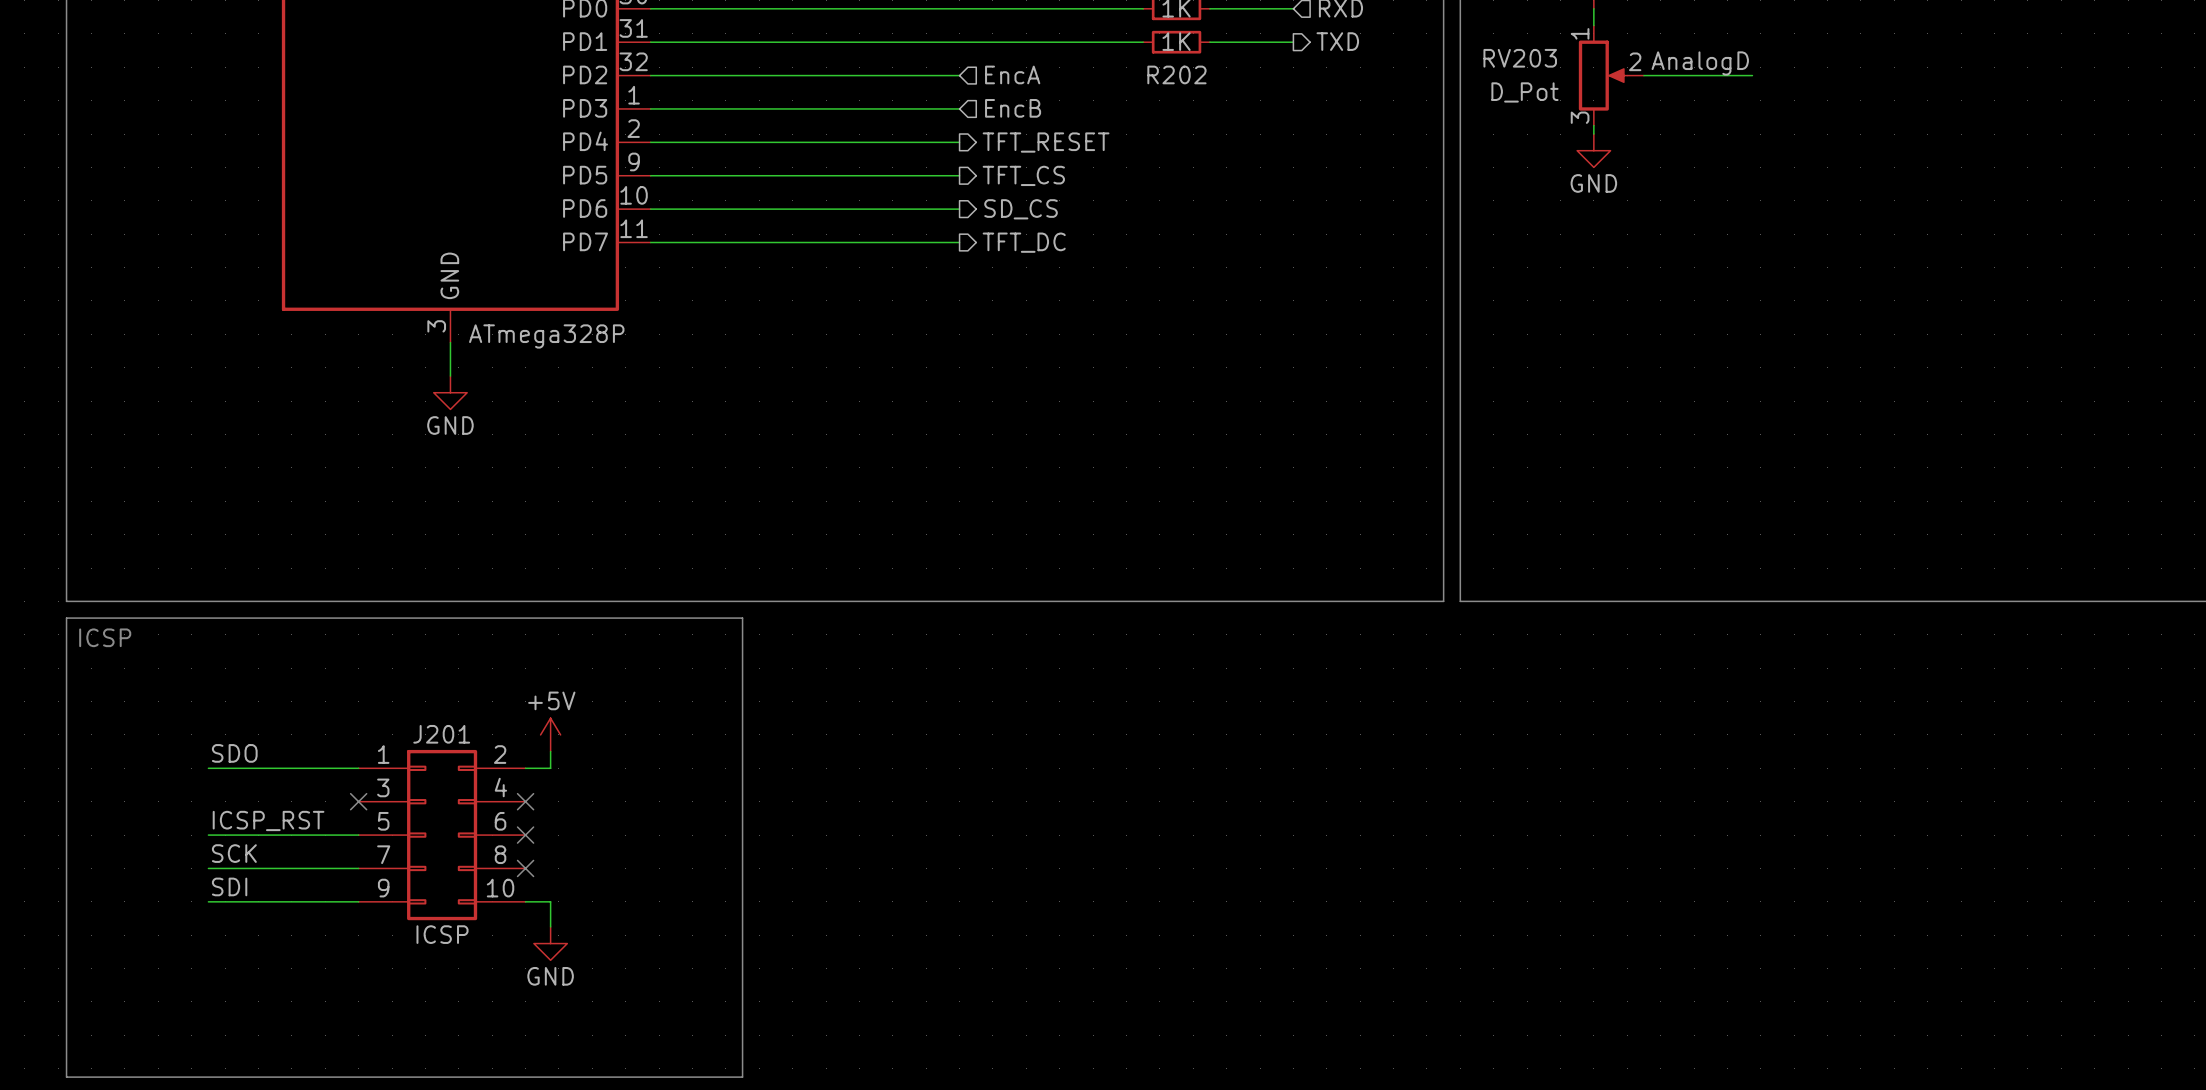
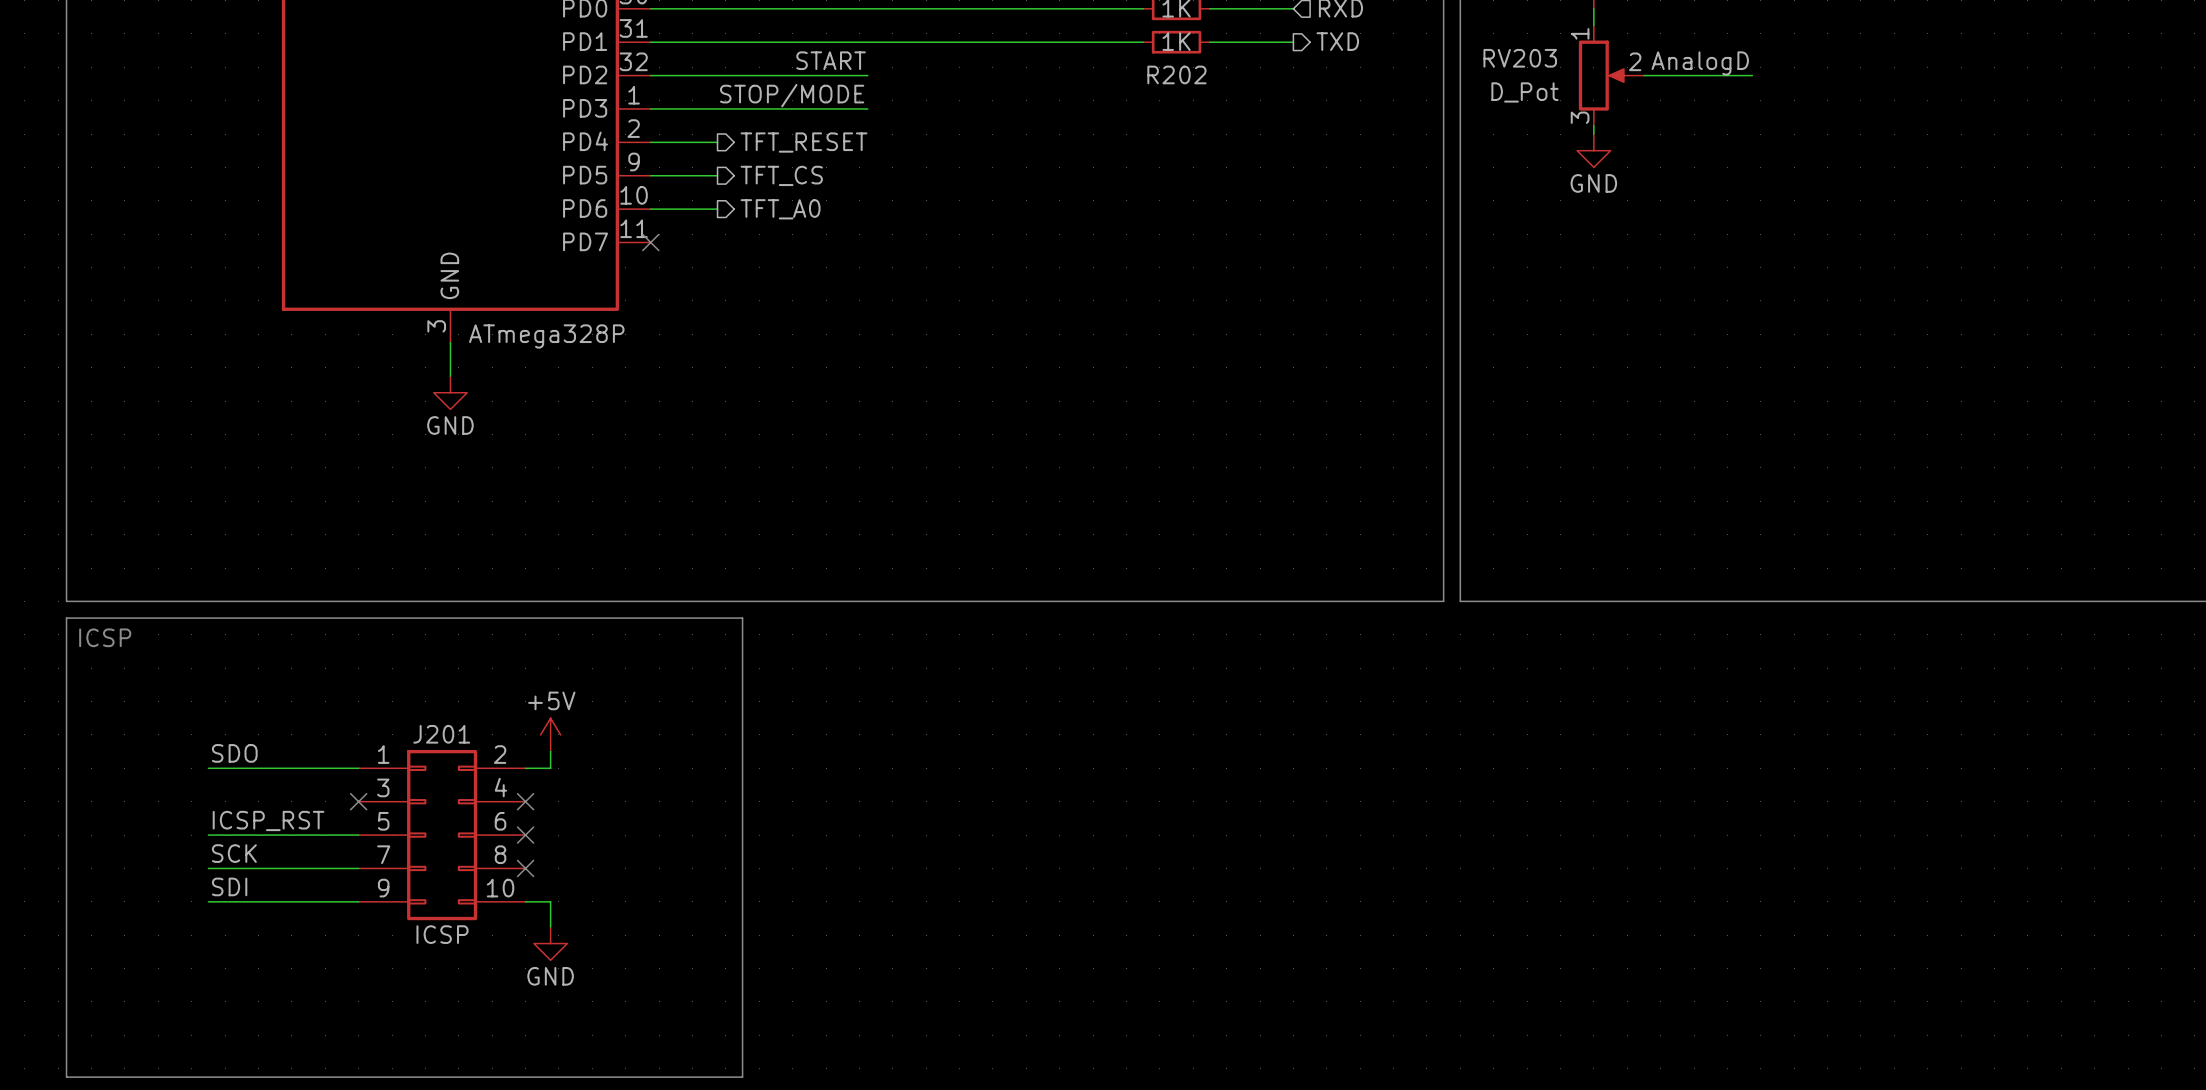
label: none -> START (831, 60)
hierarchical label: EncA (1012, 74) -> none
wire: (867, 75) (959, 75) -> none
label: none -> STOP/MODE (792, 95)
wire: (867, 108) (959, 108) -> none
hierarchical label: EncB (1013, 108) -> none
wire: (717, 142) (959, 142) -> none
hierarchical label position: TFT_RESET (1046, 142) -> TFT_RESET (804, 142)
wire: (717, 175) (959, 175) -> none
hierarchical label position: TFT_CS (1023, 175) -> TFT_CS (781, 175)
wire: (717, 209) (959, 209) -> none
hierarchical label: none -> TFT_A0 (780, 209)
hierarchical label: SD_CS (1021, 209) -> none
wire: (650, 242) (959, 242) -> none
no-connect mark: none -> (650, 242)
hierarchical label: TFT_DC (1024, 242) -> none

